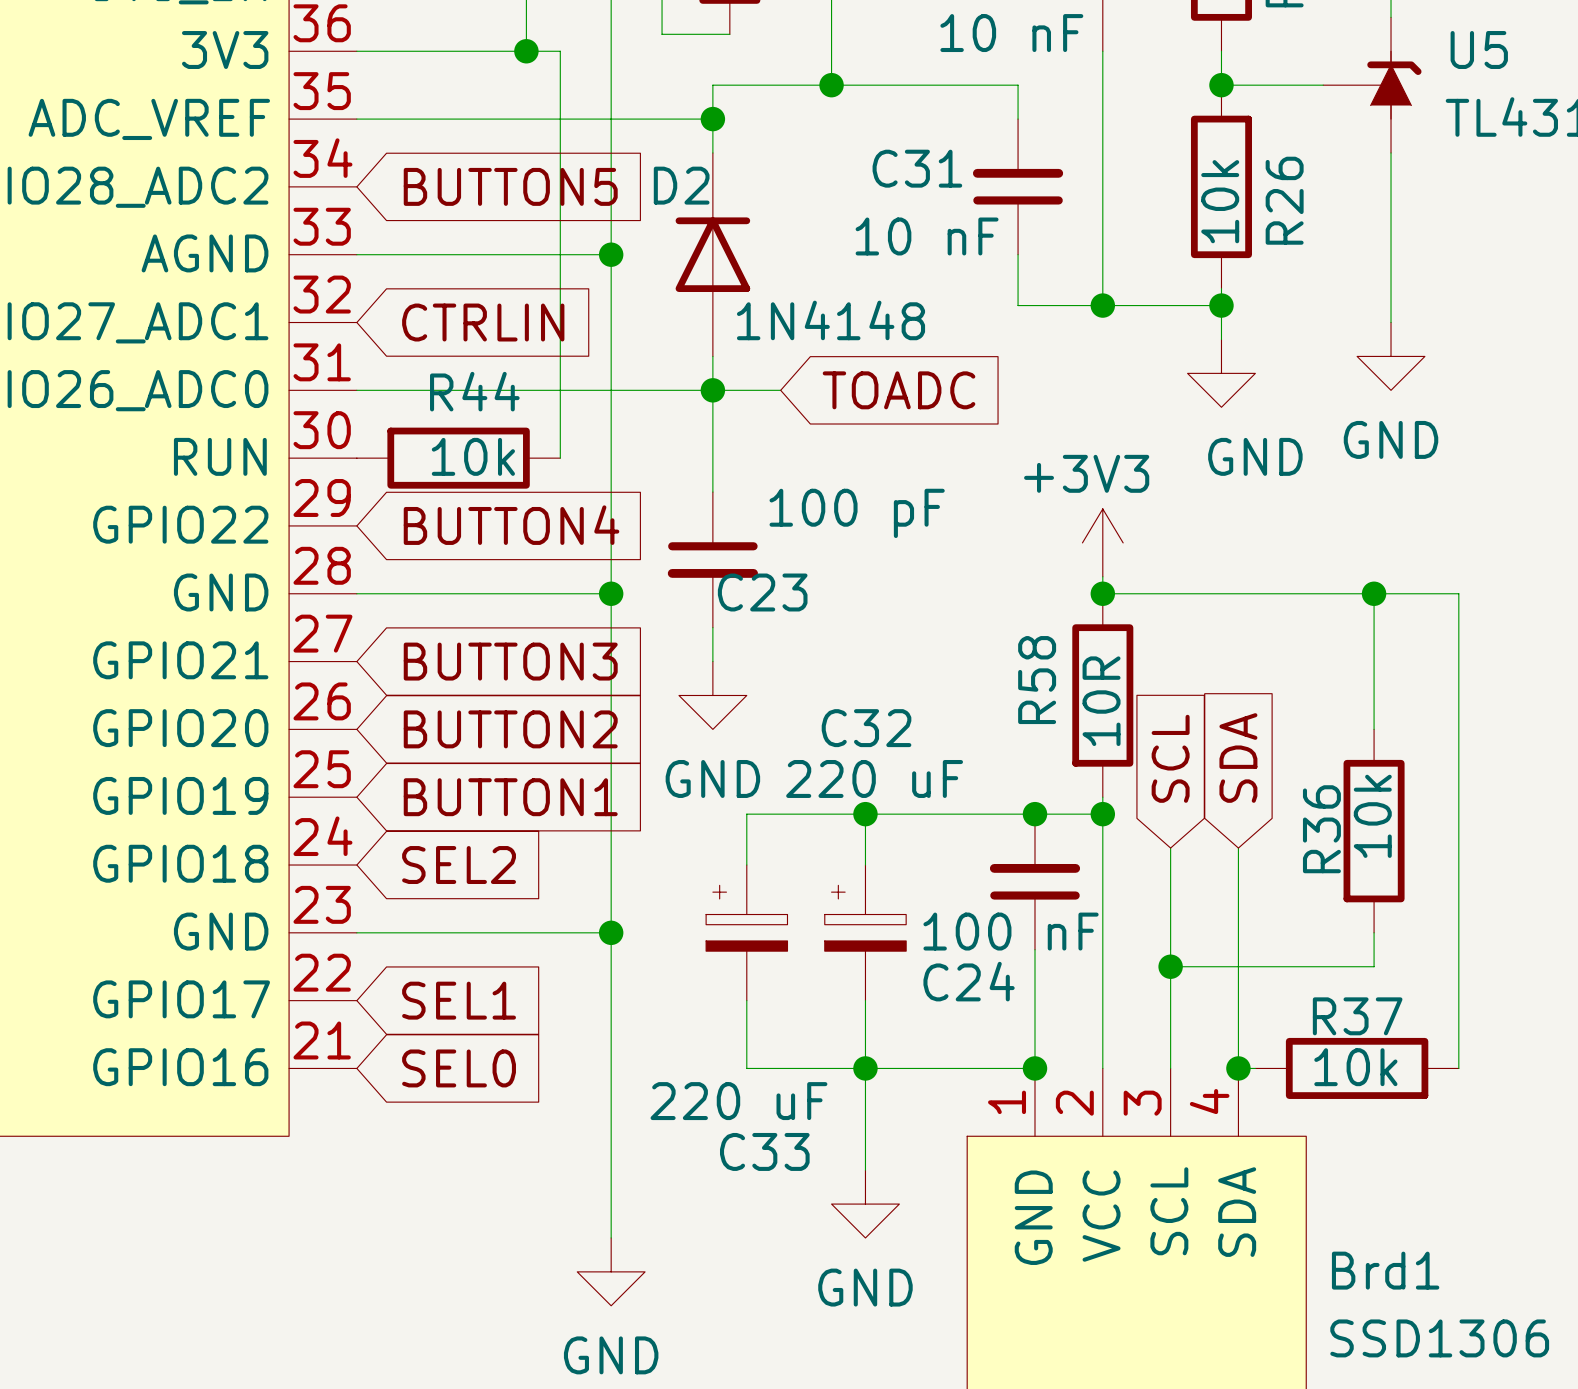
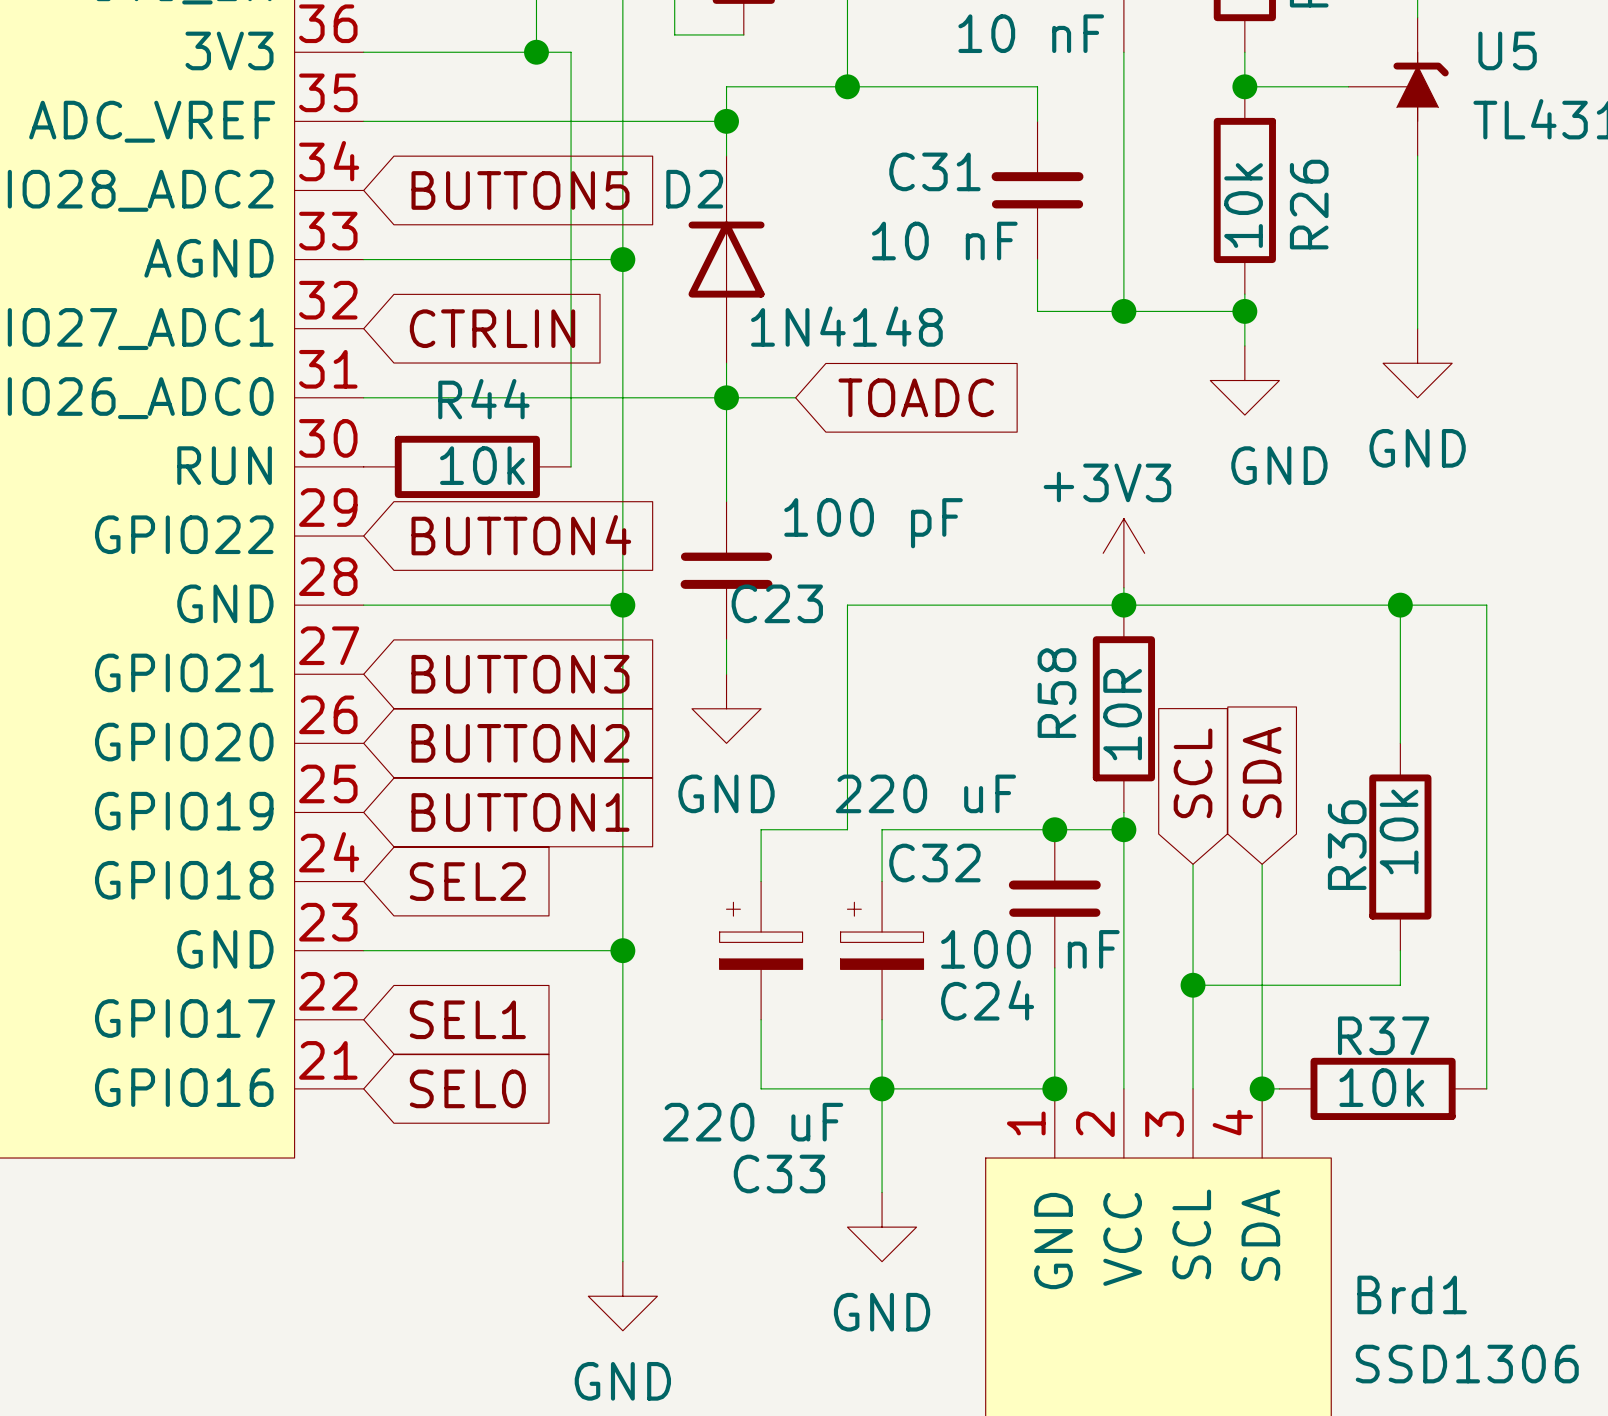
C32 name position: C32 (866, 728) -> C32 (934, 863)
C32 value position: 220 uF (874, 778) -> 220 uF (925, 793)
wire: (831, 814) (865, 814) -> (847, 829) (847, 605) (1123, 605)
junction: (865, 814) -> none

